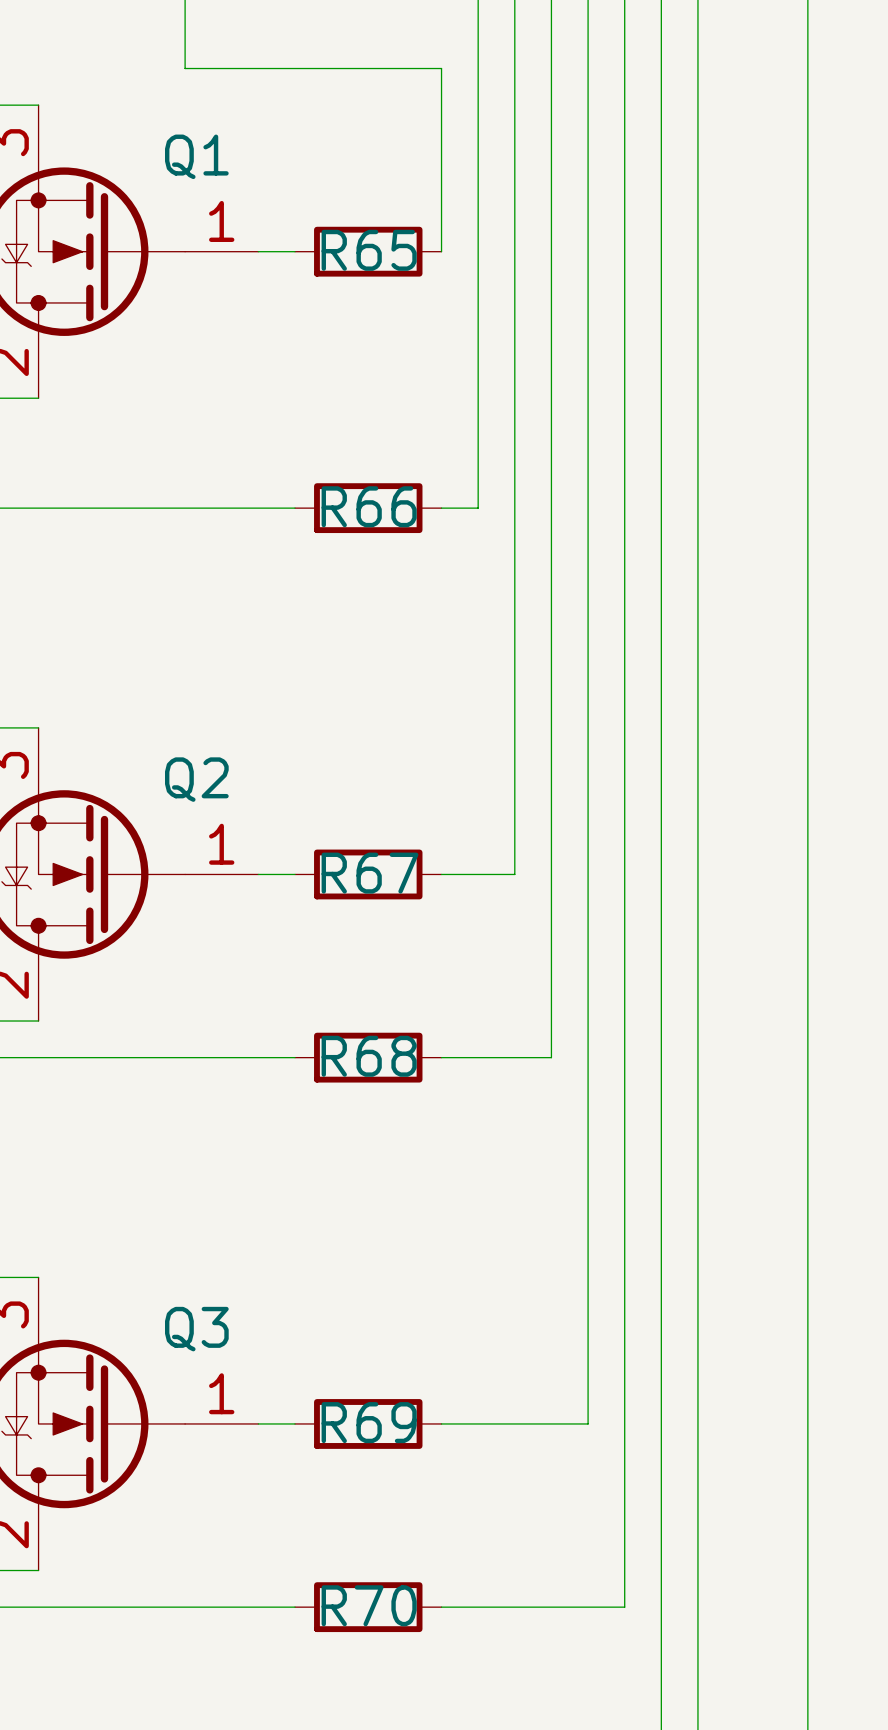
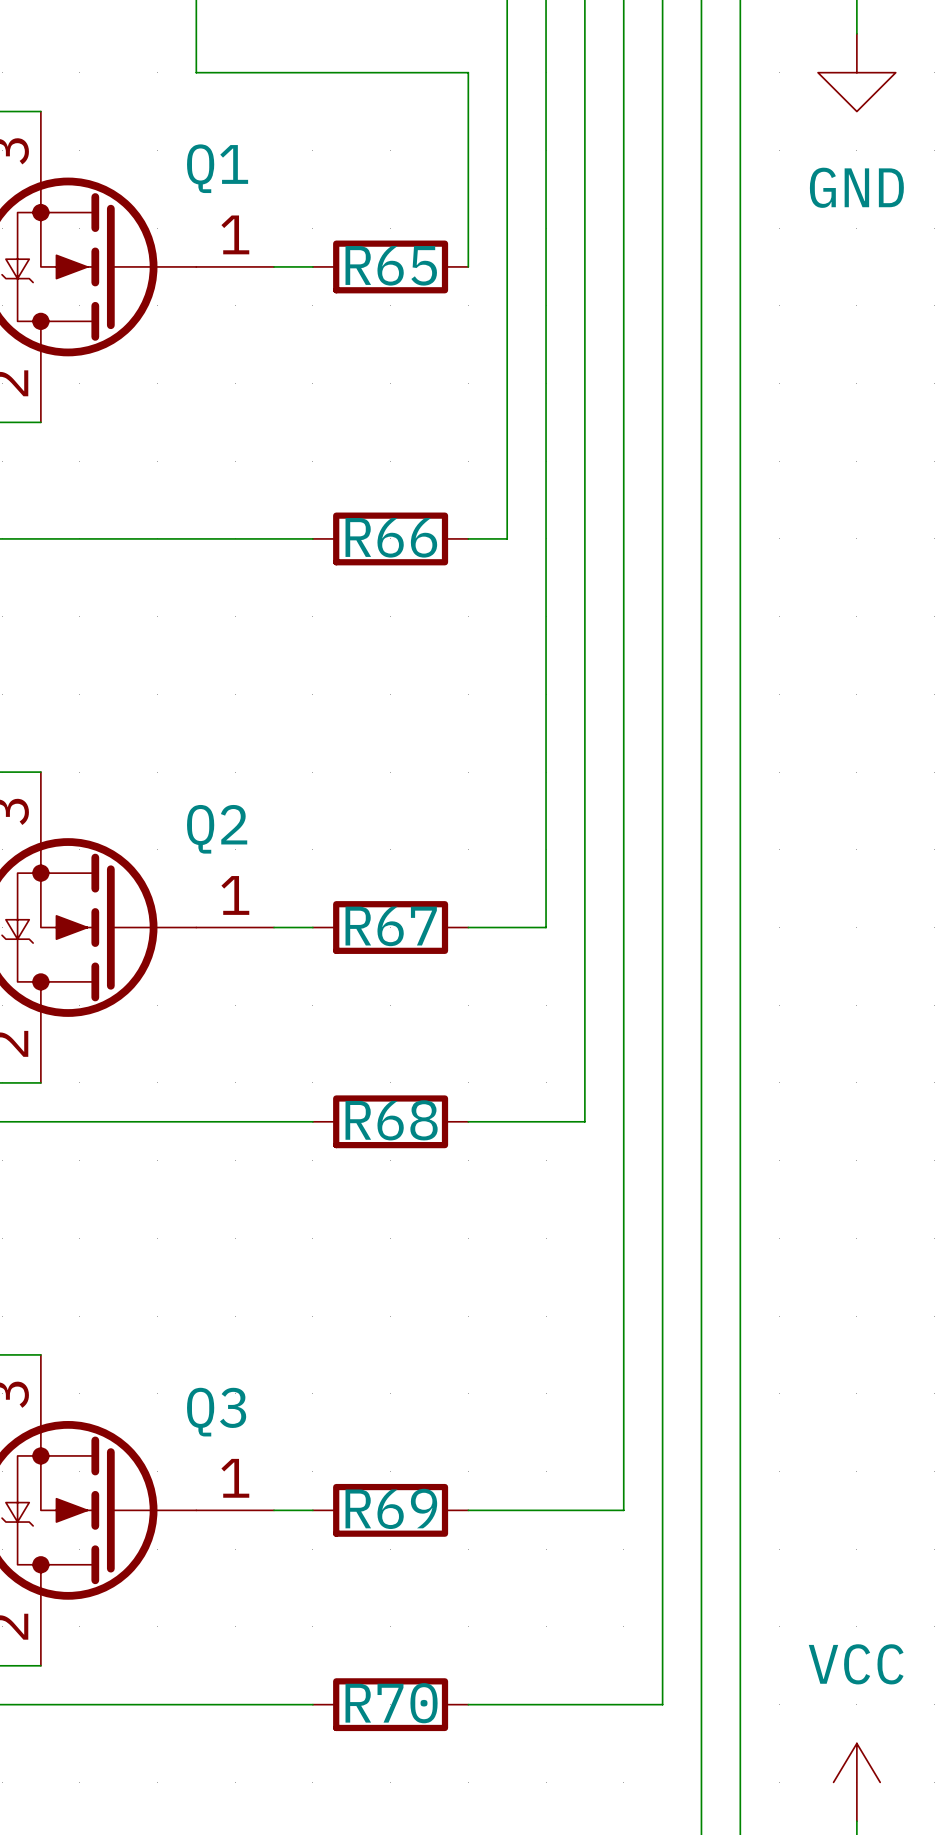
wire: (807, 31) (807, 1717) -> none
power symbol: none -> GND (856, 72)
power symbol: none -> VCC (856, 1782)

